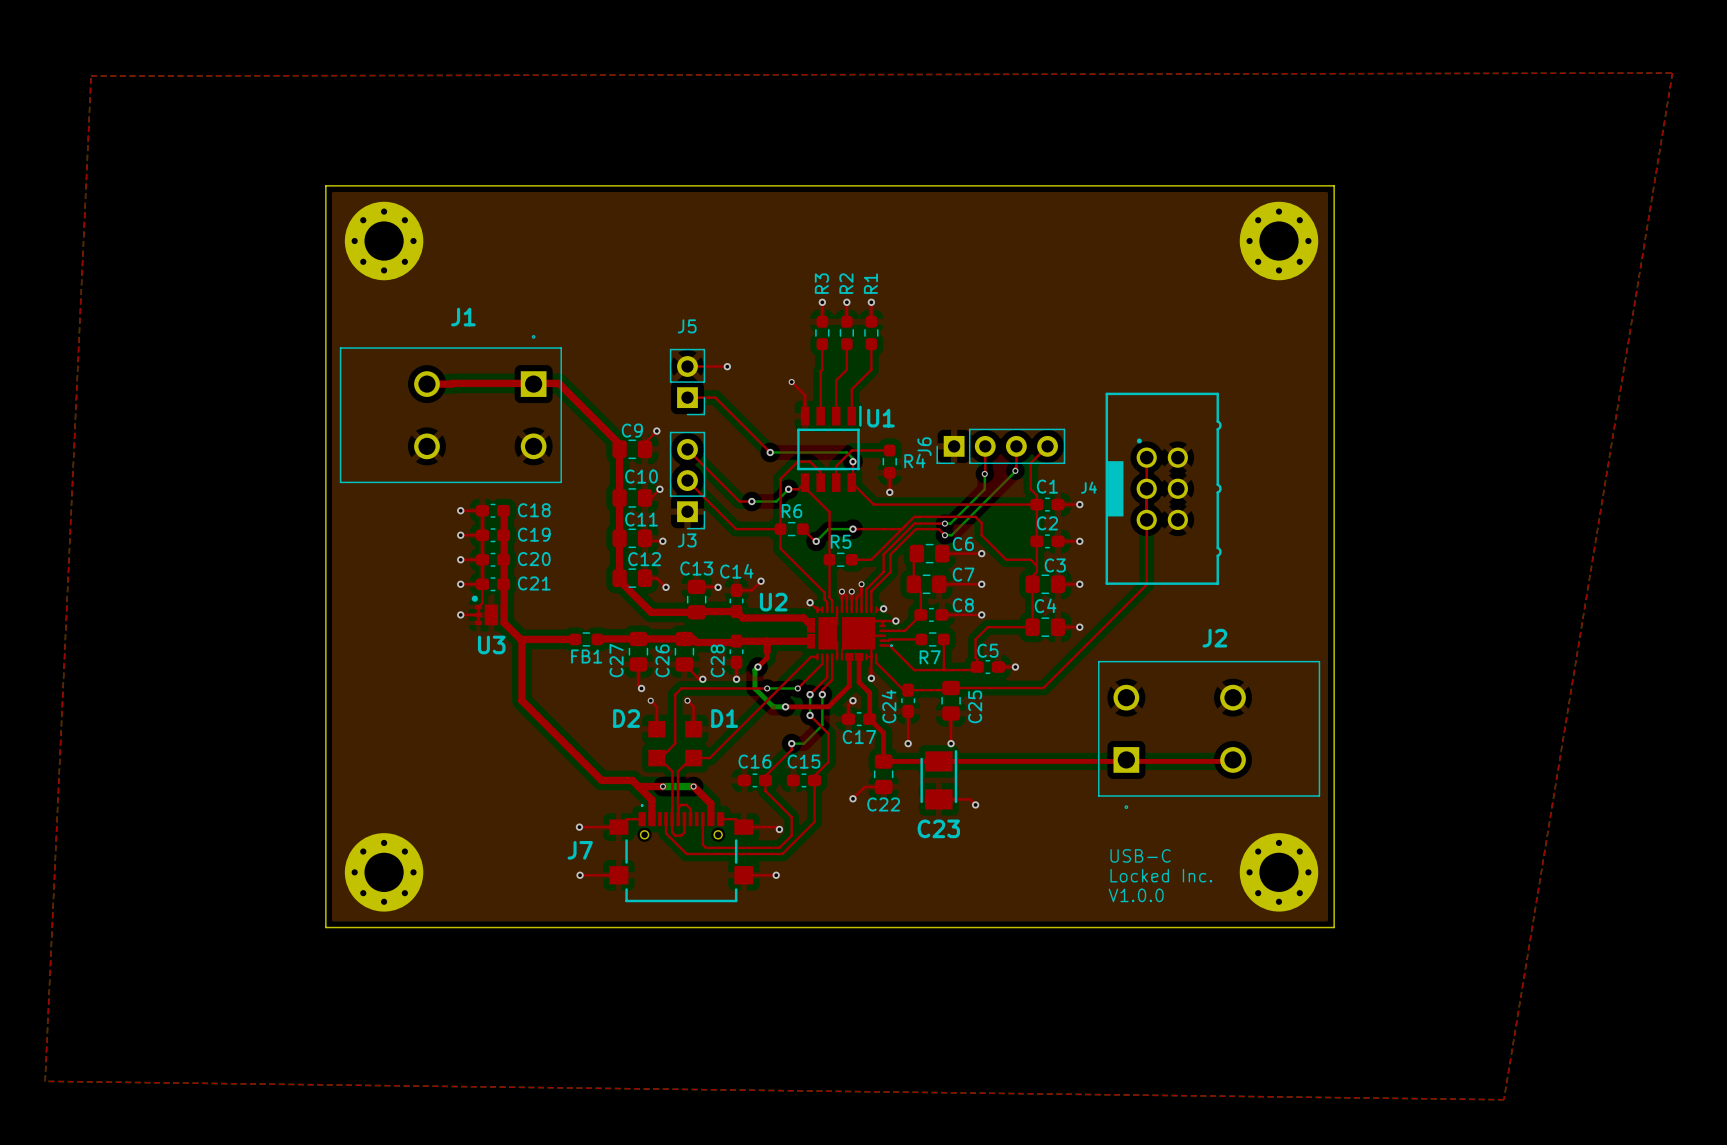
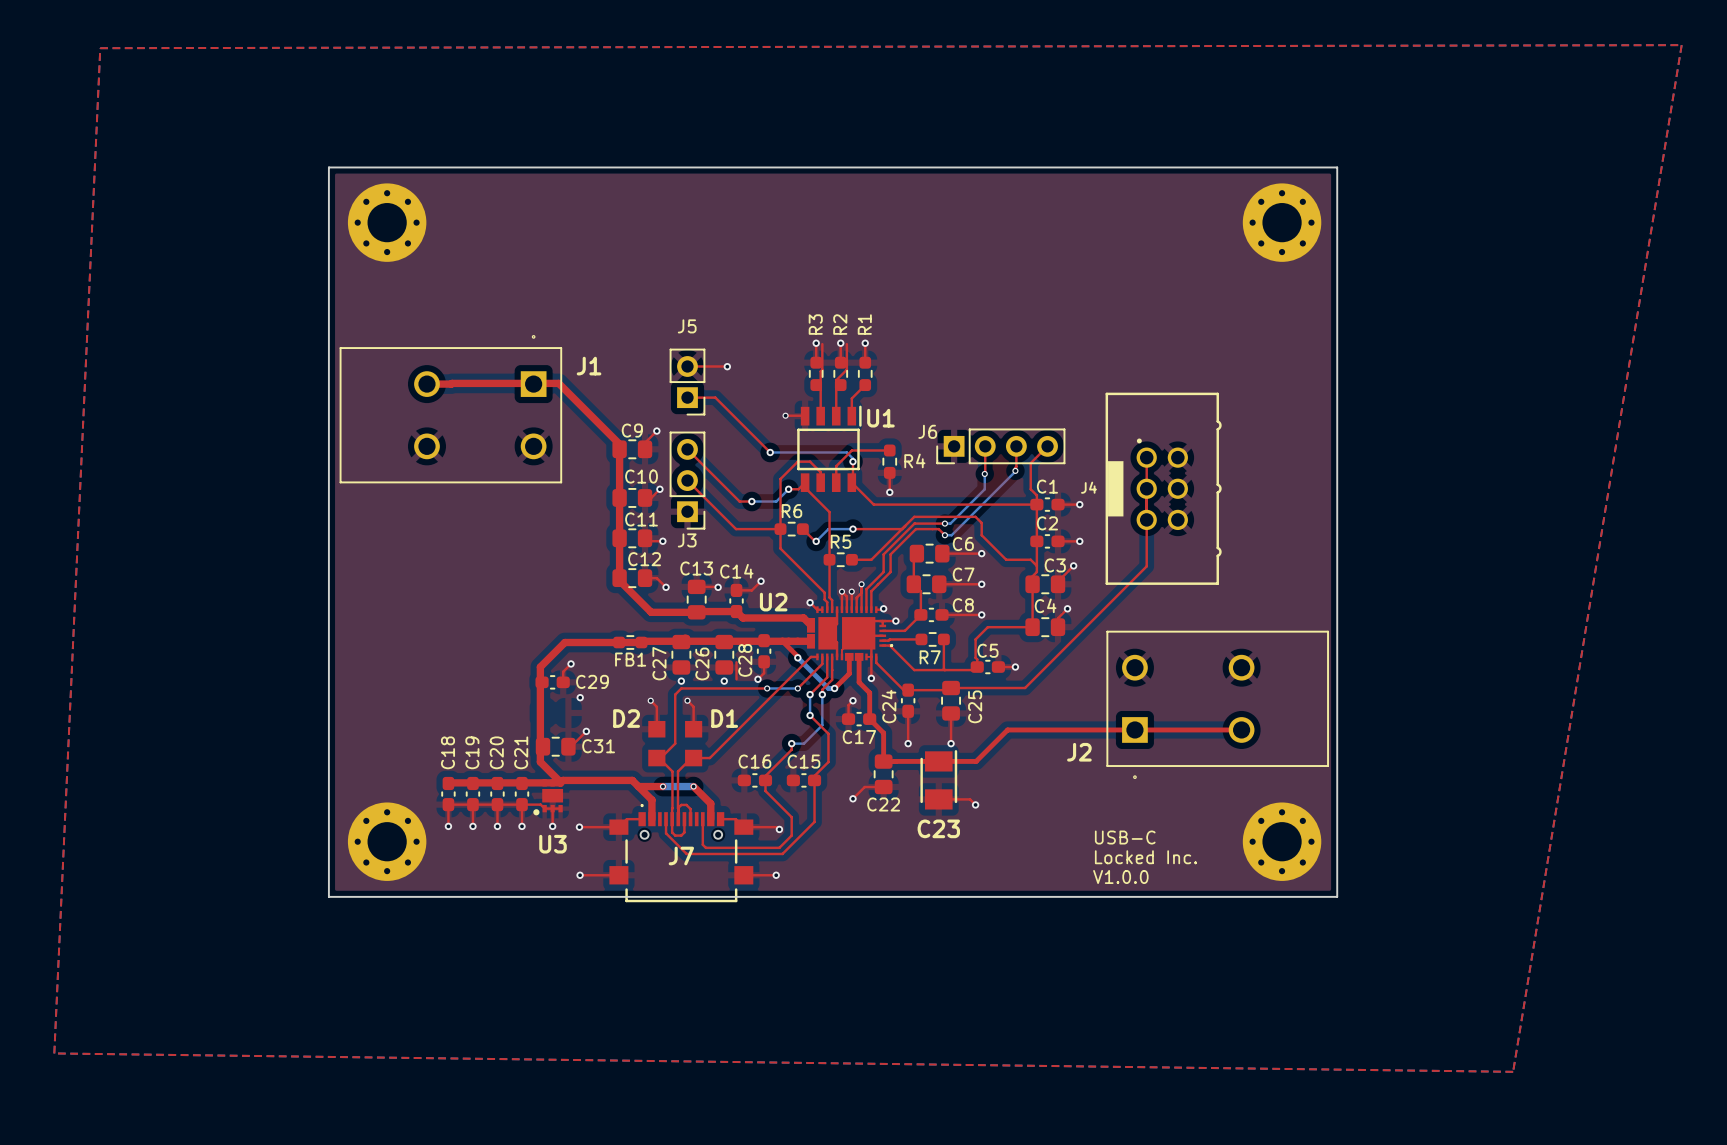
top zone outline: (1672, 73) (91, 76) (45, 1081) (1503, 1099) (1672, 73) -> (1681, 45) (100, 48) (54, 1053) (1513, 1071) (1681, 45)
board edge: (325, 185) (1334, 185) (1334, 927) (325, 927) (325, 185) -> (328, 167) (328, 896) (1337, 896) (1337, 167) (328, 167)
part position: (384, 241) -> (387, 222)
part position: (1278, 241) -> (1282, 222)
top track: (822, 302) (822, 321) -> (816, 343) (816, 362)
via: (822, 302) -> none
top track: (846, 302) (846, 321) -> (840, 343) (840, 362)
via: (846, 302) -> none
top track: (871, 302) (871, 321) -> (865, 343) (865, 362)
via: (871, 302) -> none
J1 name position: J1 (463, 317) -> J1 (589, 366)
R3 position: (822, 332) -> (816, 373)
R2 position: (846, 332) -> (840, 373)
R1 position: (871, 332) -> (865, 373)
via: none -> (816, 343)
via: none -> (840, 343)
via: none -> (865, 343)
top track: (871, 344) (871, 369) (851, 389) (851, 398) -> (865, 385) (851, 398)
top track: (791, 382) (805, 395) (805, 416) -> (785, 415) (805, 416)
via position: (791, 382) -> (785, 415)
J6 name rotation: 0° (924, 446) -> 90° clockwise (927, 431)
top track: (460, 510) (482, 510) (482, 602) (478, 606) (478, 622) -> none
via: (460, 510) -> none
C18 rotation: 0° (493, 510) -> 90° clockwise (448, 794)
C18 position: (493, 510) -> (448, 794)
top track: (503, 510) (504, 622) (520, 639) (575, 639) -> none
C18 name position: C18 (534, 510) -> C18 (447, 752)
C19 name position: C19 (534, 534) -> C19 (472, 752)
top track: (460, 535) (482, 535) -> none
via: (460, 535) -> none
C19 rotation: 0° (493, 535) -> 90° clockwise (472, 794)
C19 position: (493, 535) -> (472, 794)
top track: (460, 559) (482, 559) -> none
via: (460, 559) -> none
C20 rotation: 0° (493, 559) -> 90° clockwise (497, 794)
C20 position: (493, 559) -> (497, 794)
C20 name position: C20 (534, 559) -> C20 (496, 752)
via: none -> (1073, 565)
top track: (1146, 566) (1146, 584) (1043, 688) (1025, 688) -> (1146, 566) (1025, 688)
C21 name position: C21 (534, 583) -> C21 (521, 752)
top track: (460, 584) (482, 584) -> none
via: (460, 584) -> none
C21 rotation: 0° (493, 584) -> 90° clockwise (521, 794)
C21 position: (493, 584) -> (521, 794)
top track: (1058, 584) (1079, 584) -> (1058, 584) (1058, 581) (1073, 565)
via: (1079, 584) -> none
via: none -> (1067, 608)
U3 rotation: 0° (489, 610) -> 90° counterclockwise (548, 797)
U3 position: (489, 610) -> (548, 797)
top track: (460, 614) (478, 614) -> none
via: (460, 614) -> none
top track: (1058, 627) (1079, 627) -> (1058, 627) (1058, 618) (1067, 608)
via: (1079, 627) -> none
J2 name position: J2 (1214, 638) -> J2 (1079, 752)
top track: (521, 639) (521, 700) (601, 780) -> (560, 782) (563, 780) (601, 780)
FB1 position: (586, 639) -> (630, 642)
top track: (597, 639) (693, 638) (696, 642) (739, 641) -> (560, 782) (540, 762) (540, 667) (564, 642) (739, 641)
top track: (767, 641) (767, 657) (757, 667) -> none
top track: none -> (782, 641) (797, 657)
C27 position: (638, 651) -> (681, 654)
C26 position: (684, 651) -> (724, 654)
C28 position: (736, 651) -> (764, 651)
bottom track: none -> (797, 657) (828, 688) (834, 688)
via: none -> (797, 657)
top track: none -> (764, 661) (764, 673) (757, 679)
top track: none -> (571, 663) (563, 671) (563, 682)
via: none -> (571, 663)
top track: (638, 664) (638, 685) (641, 688) -> none
top track: (684, 664) (699, 679) (702, 679) -> none
bottom track: (757, 667) (754, 670) (754, 688) (773, 706) (785, 706) -> none
via: (757, 667) -> none
top track: (849, 673) (849, 686) (828, 706) (785, 706) -> (849, 673) (834, 688)
via: (702, 679) -> none
via: (736, 679) -> none
via: none -> (757, 679)
via: none -> (681, 681)
via: none -> (724, 681)
C29: none -> (552, 682)
via: (641, 688) -> none
via: none -> (834, 688)
via: none -> (580, 697)
via: (785, 706) -> none
top track: none -> (586, 731) (571, 746) (568, 746)
via: none -> (586, 731)
J2 position: (1209, 735) -> (1217, 705)
C31: none -> (555, 746)
top track: (1233, 759) (976, 761) -> (1241, 729) (1007, 729) (976, 761)
top track: none -> (449, 782) (560, 782)
top track: none -> (472, 804) (472, 826)
top track: none -> (497, 804) (497, 826)
top track: none -> (521, 804) (521, 826)
top track: none -> (552, 808) (552, 826)
top track: none -> (560, 808) (544, 808) (540, 804) (448, 804) (448, 826)
via: none -> (448, 826)
via: none -> (472, 826)
via: none -> (497, 826)
via: none -> (521, 826)
via: none -> (552, 826)
J7 name position: J7 (580, 850) -> J7 (681, 855)
text position: USB-C (1140, 855) -> USB-C (1125, 837)
part position: (384, 872) -> (387, 841)
part position: (1278, 872) -> (1282, 841)
text position: Locked Inc. (1161, 875) -> Locked Inc. (1145, 857)
text position: V1.0.0 (1136, 895) -> V1.0.0 (1120, 876)

